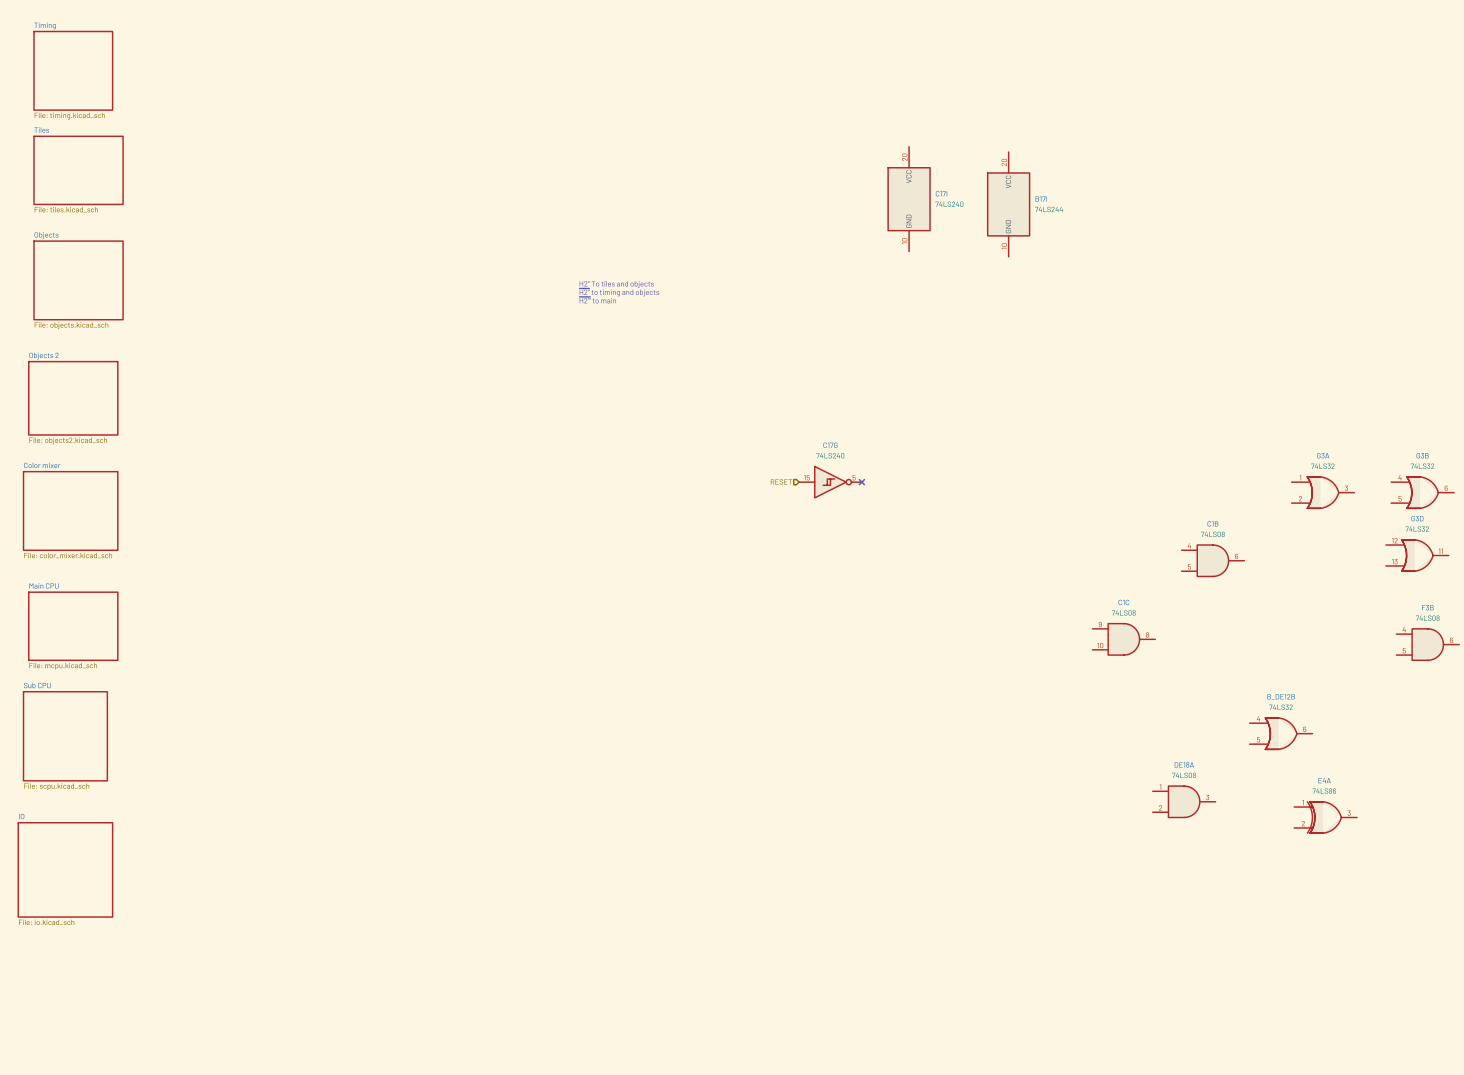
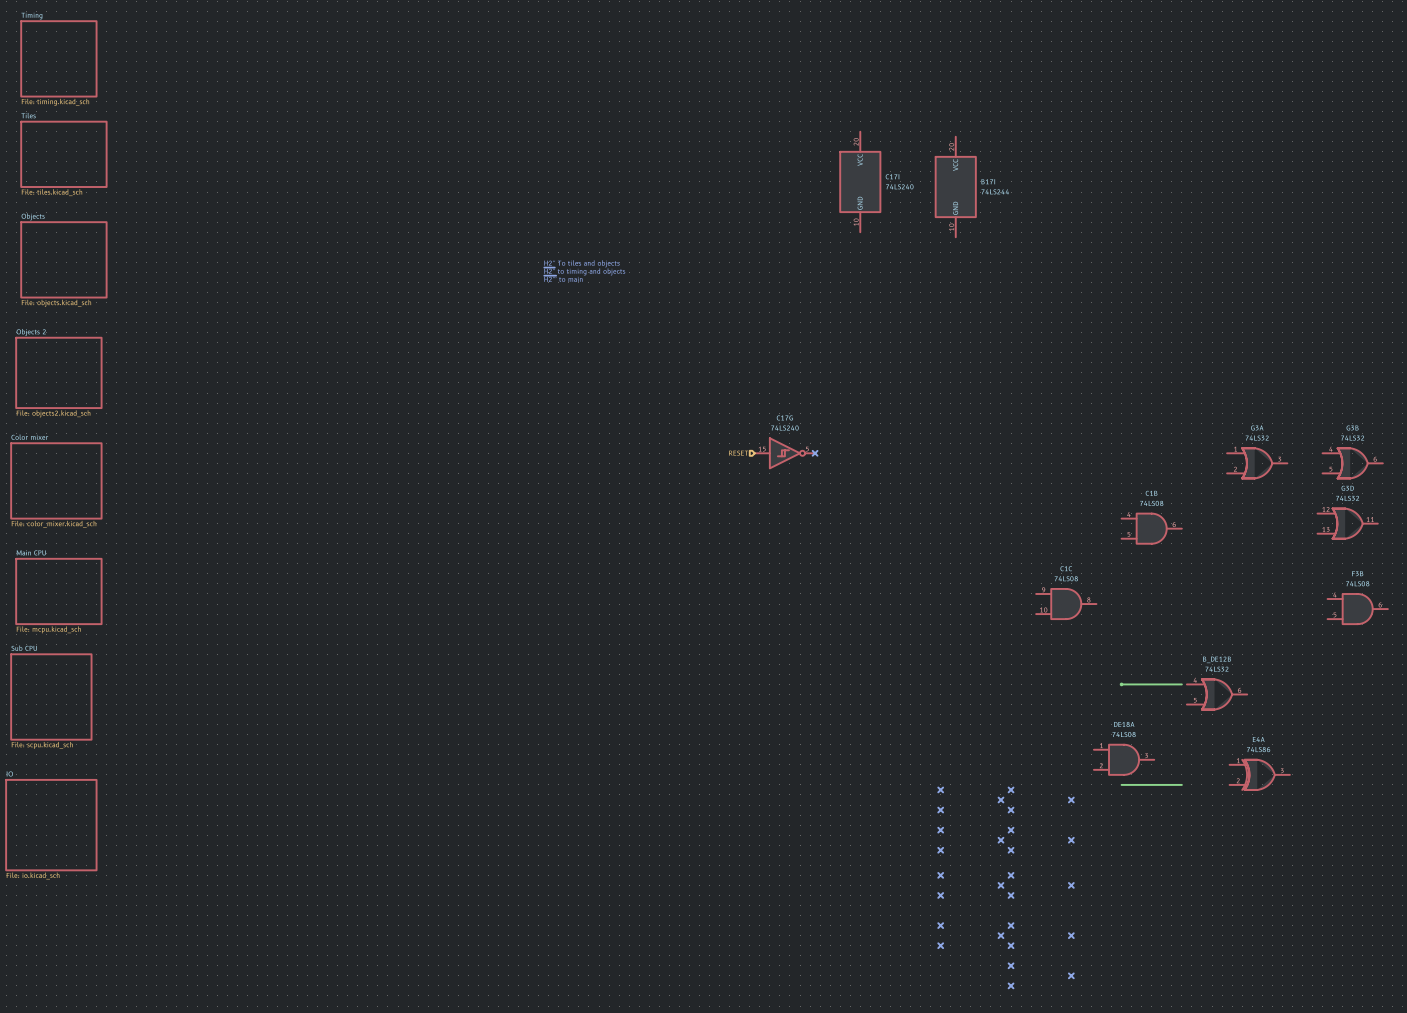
wire: none -> (1121, 684) (1181, 684)
junction: none -> (1121, 684)
wire: none -> (1121, 784) (1181, 784)
no-connect mark: none -> (940, 789)
no-connect mark: none -> (1011, 789)
no-connect mark: none -> (1000, 799)
no-connect mark: none -> (1071, 799)
no-connect mark: none -> (940, 810)
no-connect mark: none -> (1011, 810)
no-connect mark: none -> (940, 830)
no-connect mark: none -> (1011, 830)
no-connect mark: none -> (1000, 840)
no-connect mark: none -> (1071, 840)
no-connect mark: none -> (940, 850)
no-connect mark: none -> (1011, 850)
no-connect mark: none -> (940, 875)
no-connect mark: none -> (1011, 875)
no-connect mark: none -> (1000, 885)
no-connect mark: none -> (1071, 885)
no-connect mark: none -> (940, 895)
no-connect mark: none -> (1011, 895)
no-connect mark: none -> (940, 925)
no-connect mark: none -> (1011, 925)
no-connect mark: none -> (1000, 935)
no-connect mark: none -> (1071, 935)
no-connect mark: none -> (940, 945)
no-connect mark: none -> (1011, 945)
no-connect mark: none -> (1011, 965)
no-connect mark: none -> (1071, 975)
no-connect mark: none -> (1011, 985)

